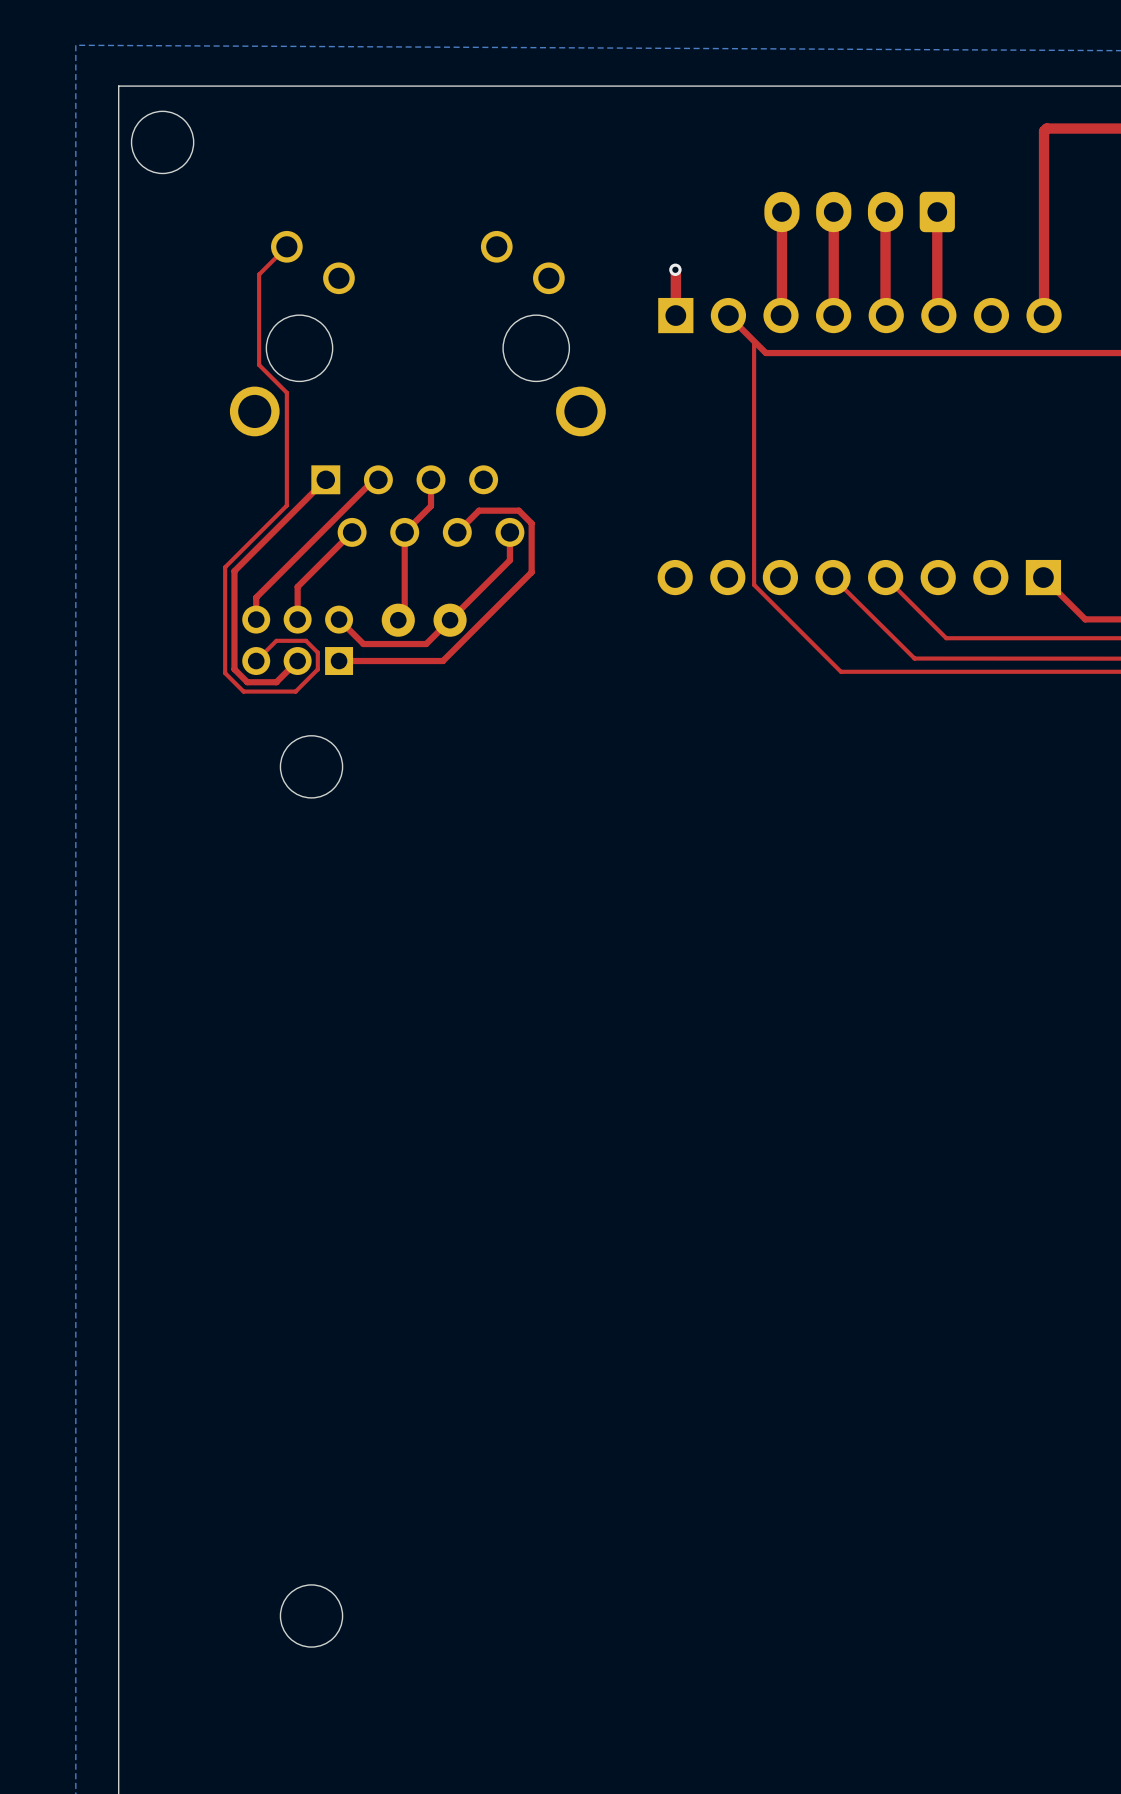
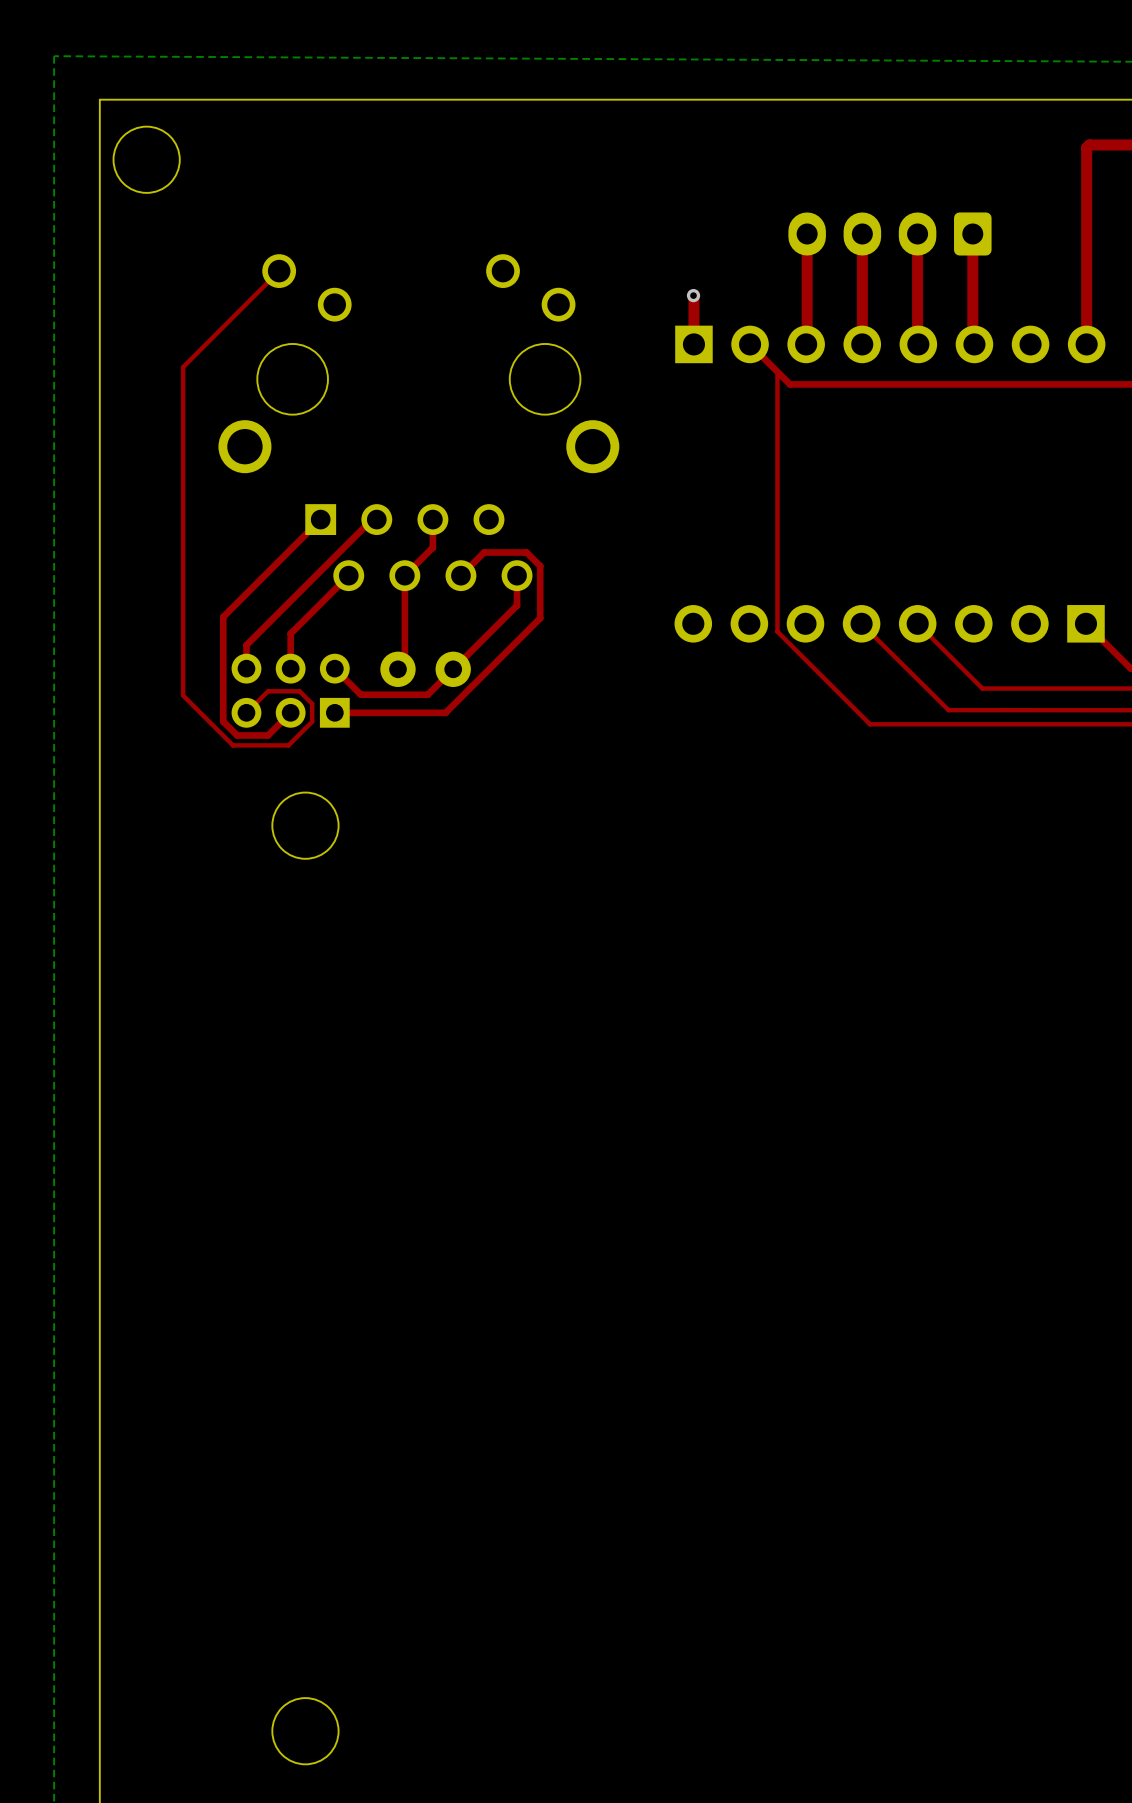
top track: (259, 274) (259, 365) (286, 392) (286, 505) (225, 567) (225, 673) -> (249, 300) (183, 367) (183, 695) (213, 725)

